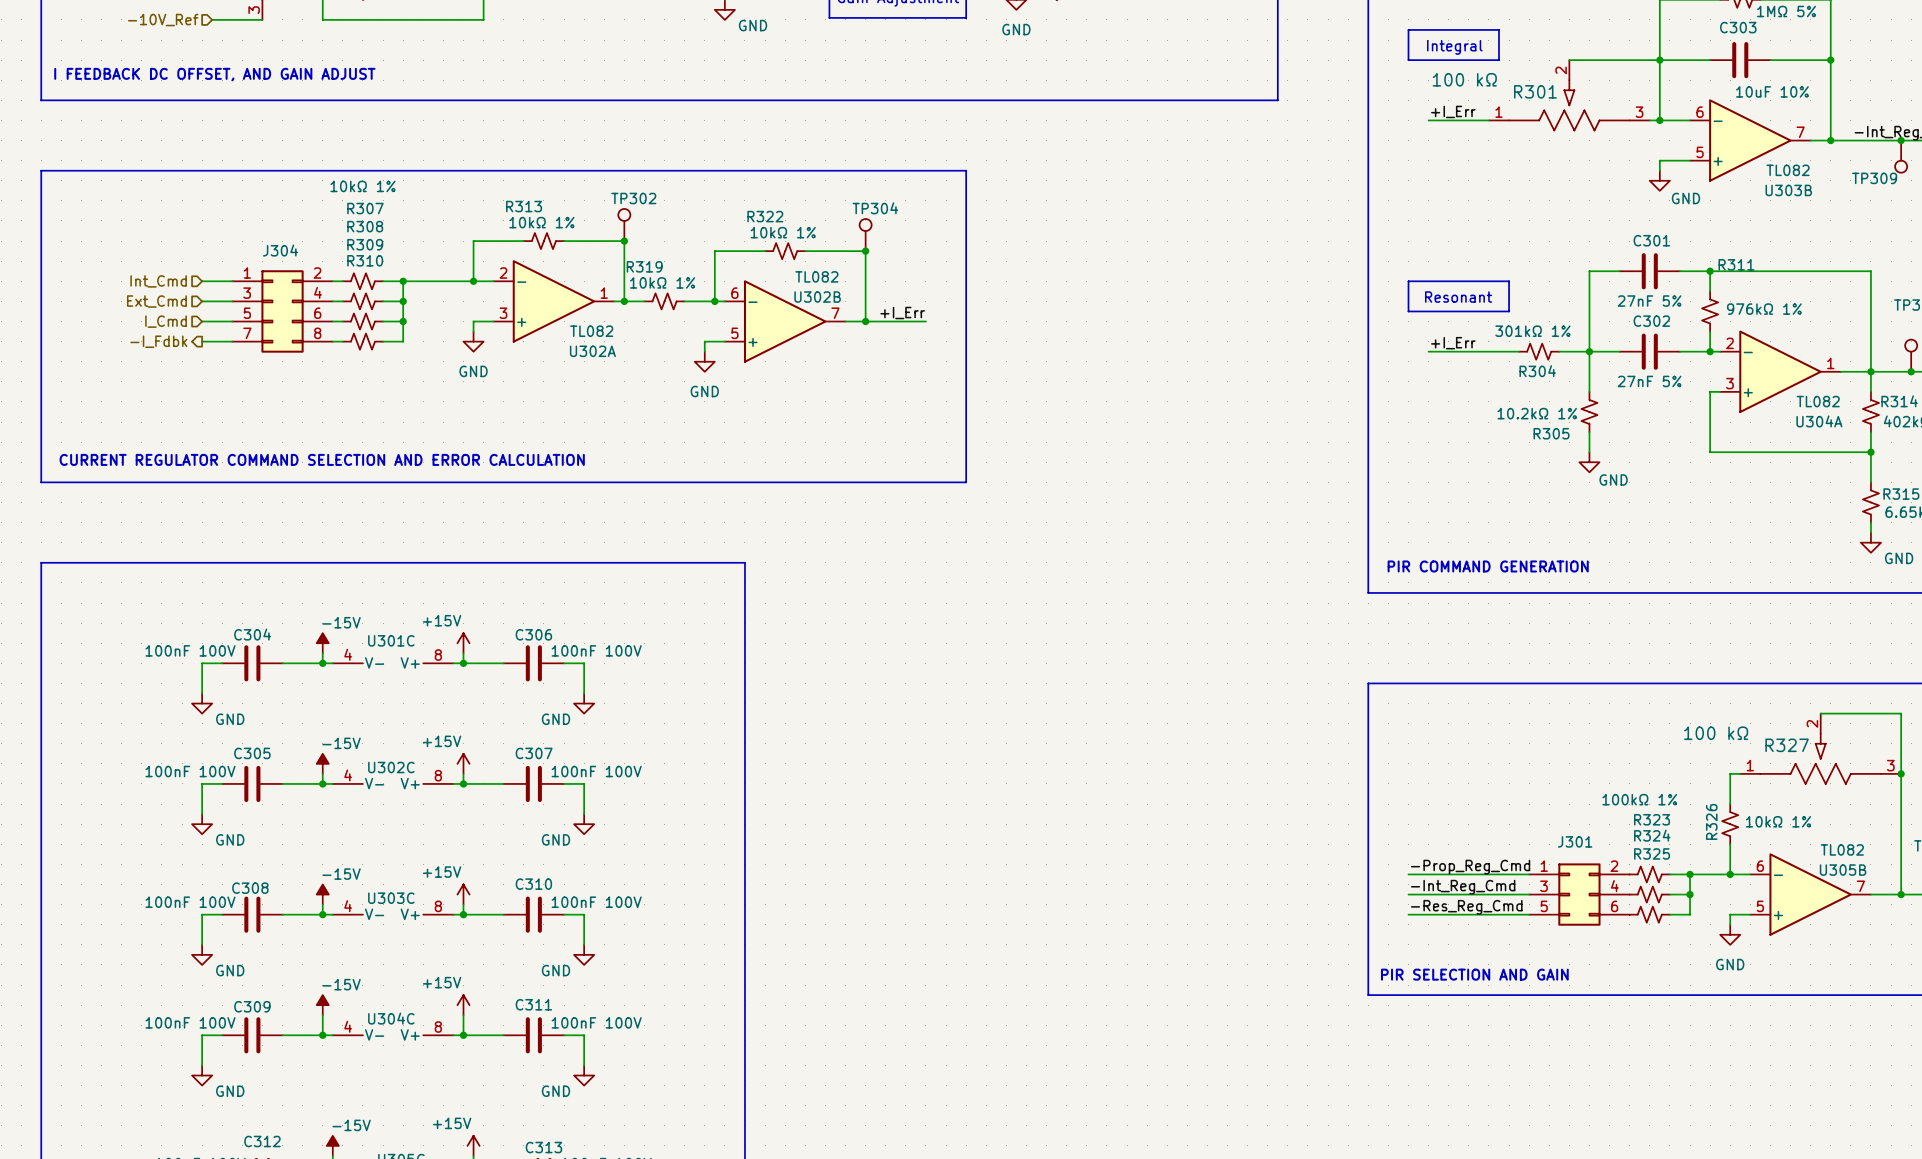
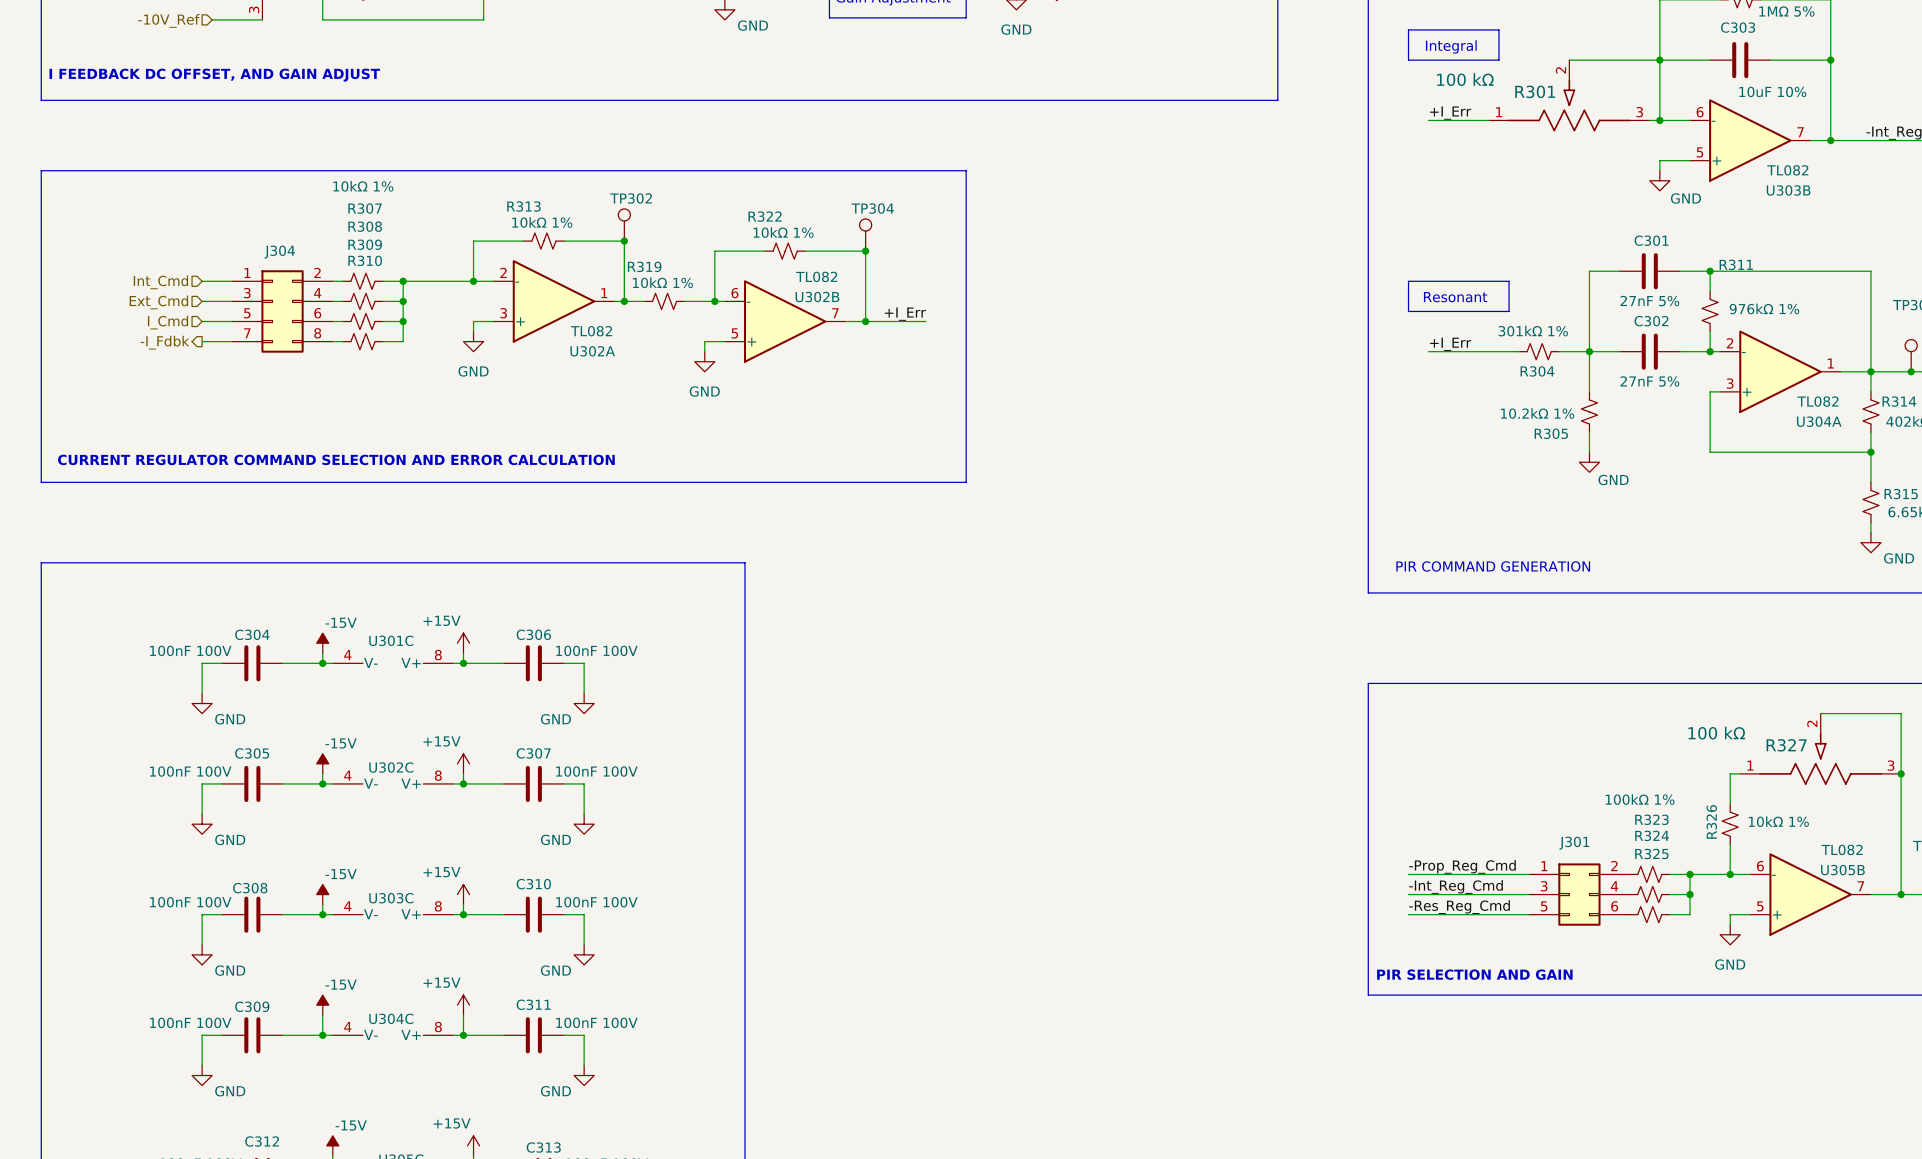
junction: (1901, 140) -> none
TP309: (1901, 156) -> none

